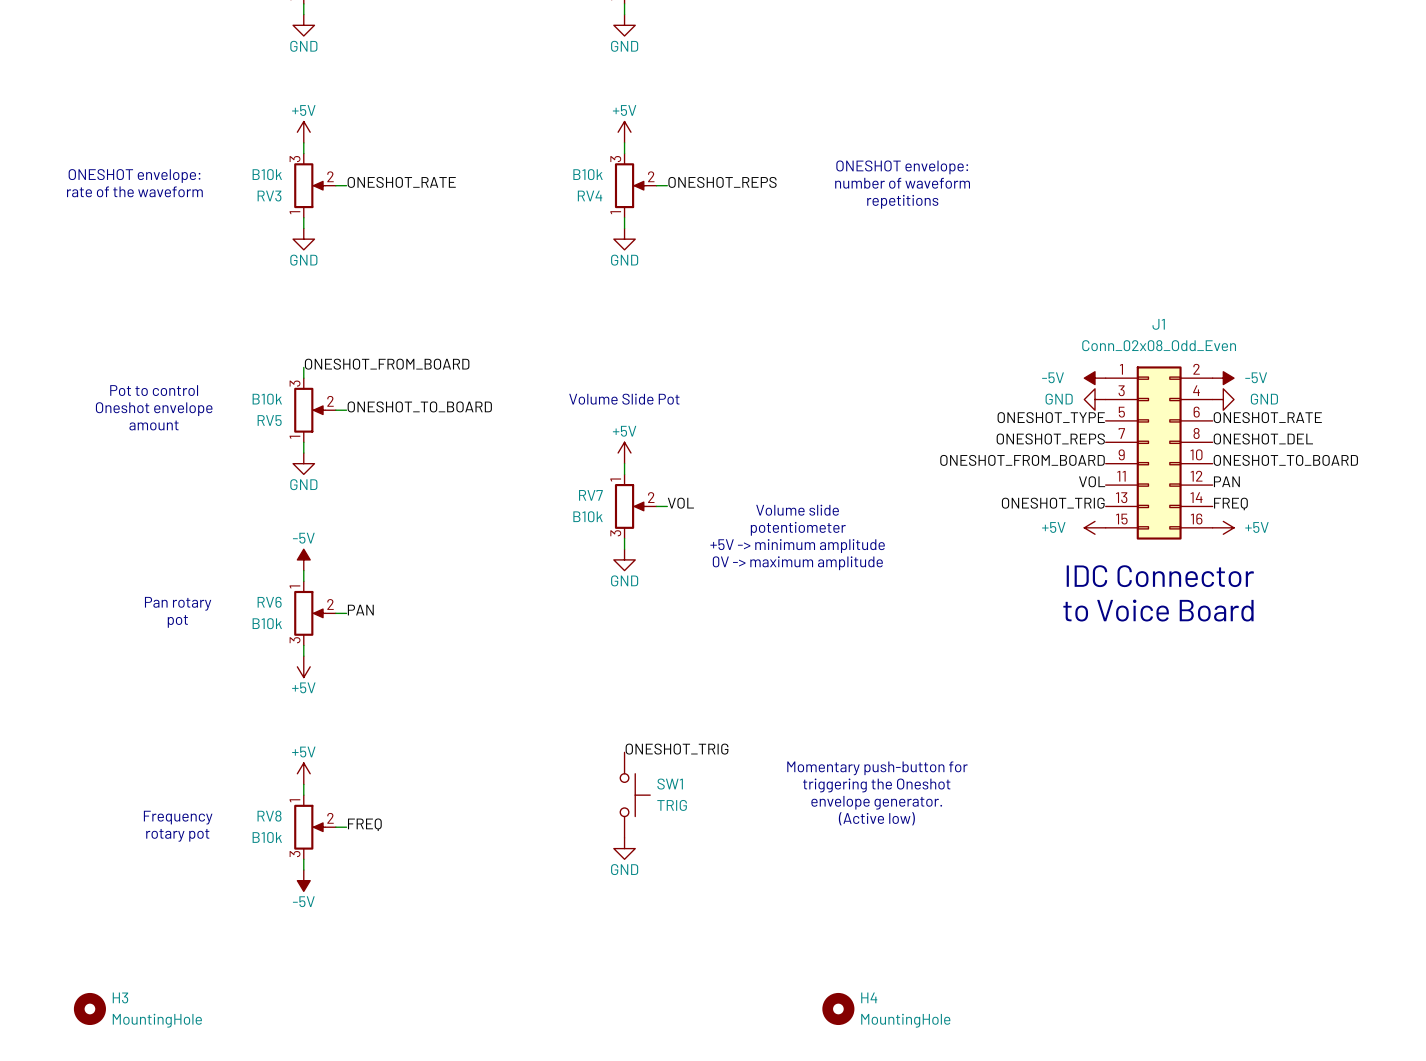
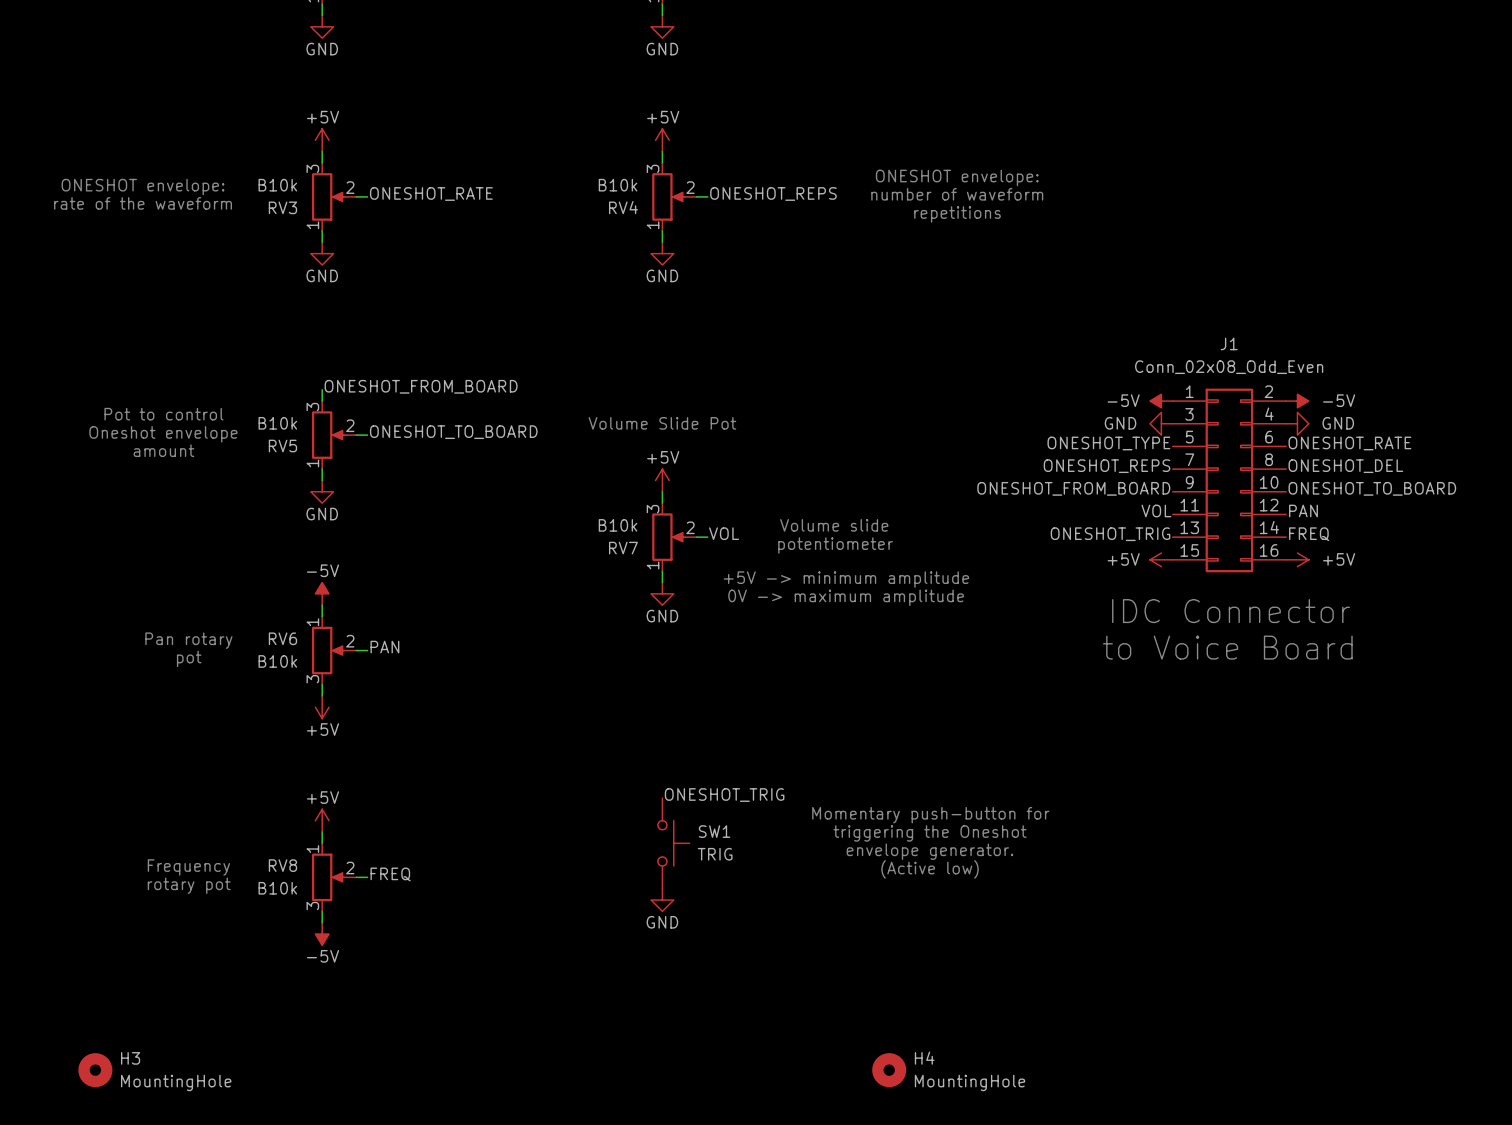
RV7 flip: as is (630, 506) -> up-down (668, 537)
text position: Volume slide (797, 510) -> Volume slide (834, 525)
text position: potentiometer (798, 528) -> potentiometer (835, 545)

